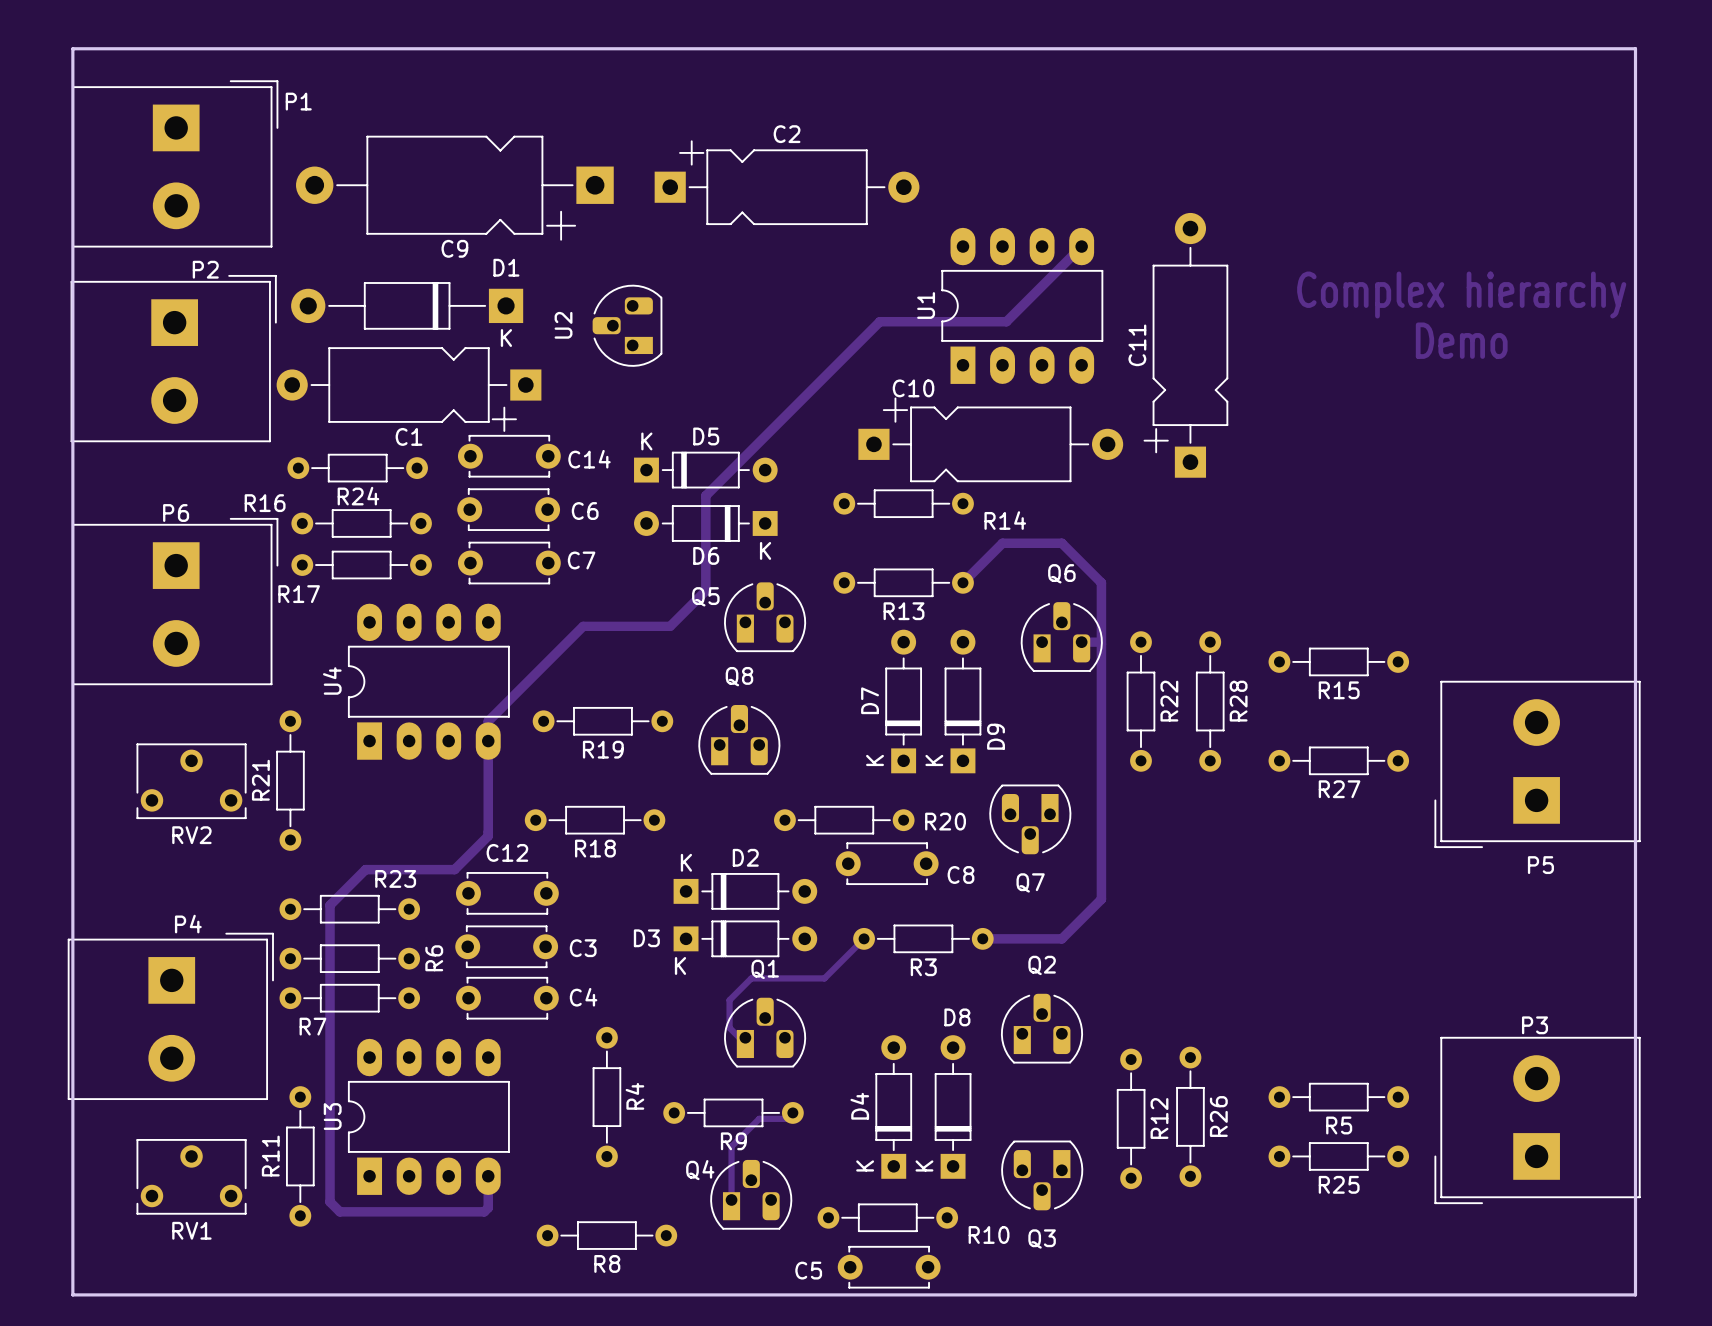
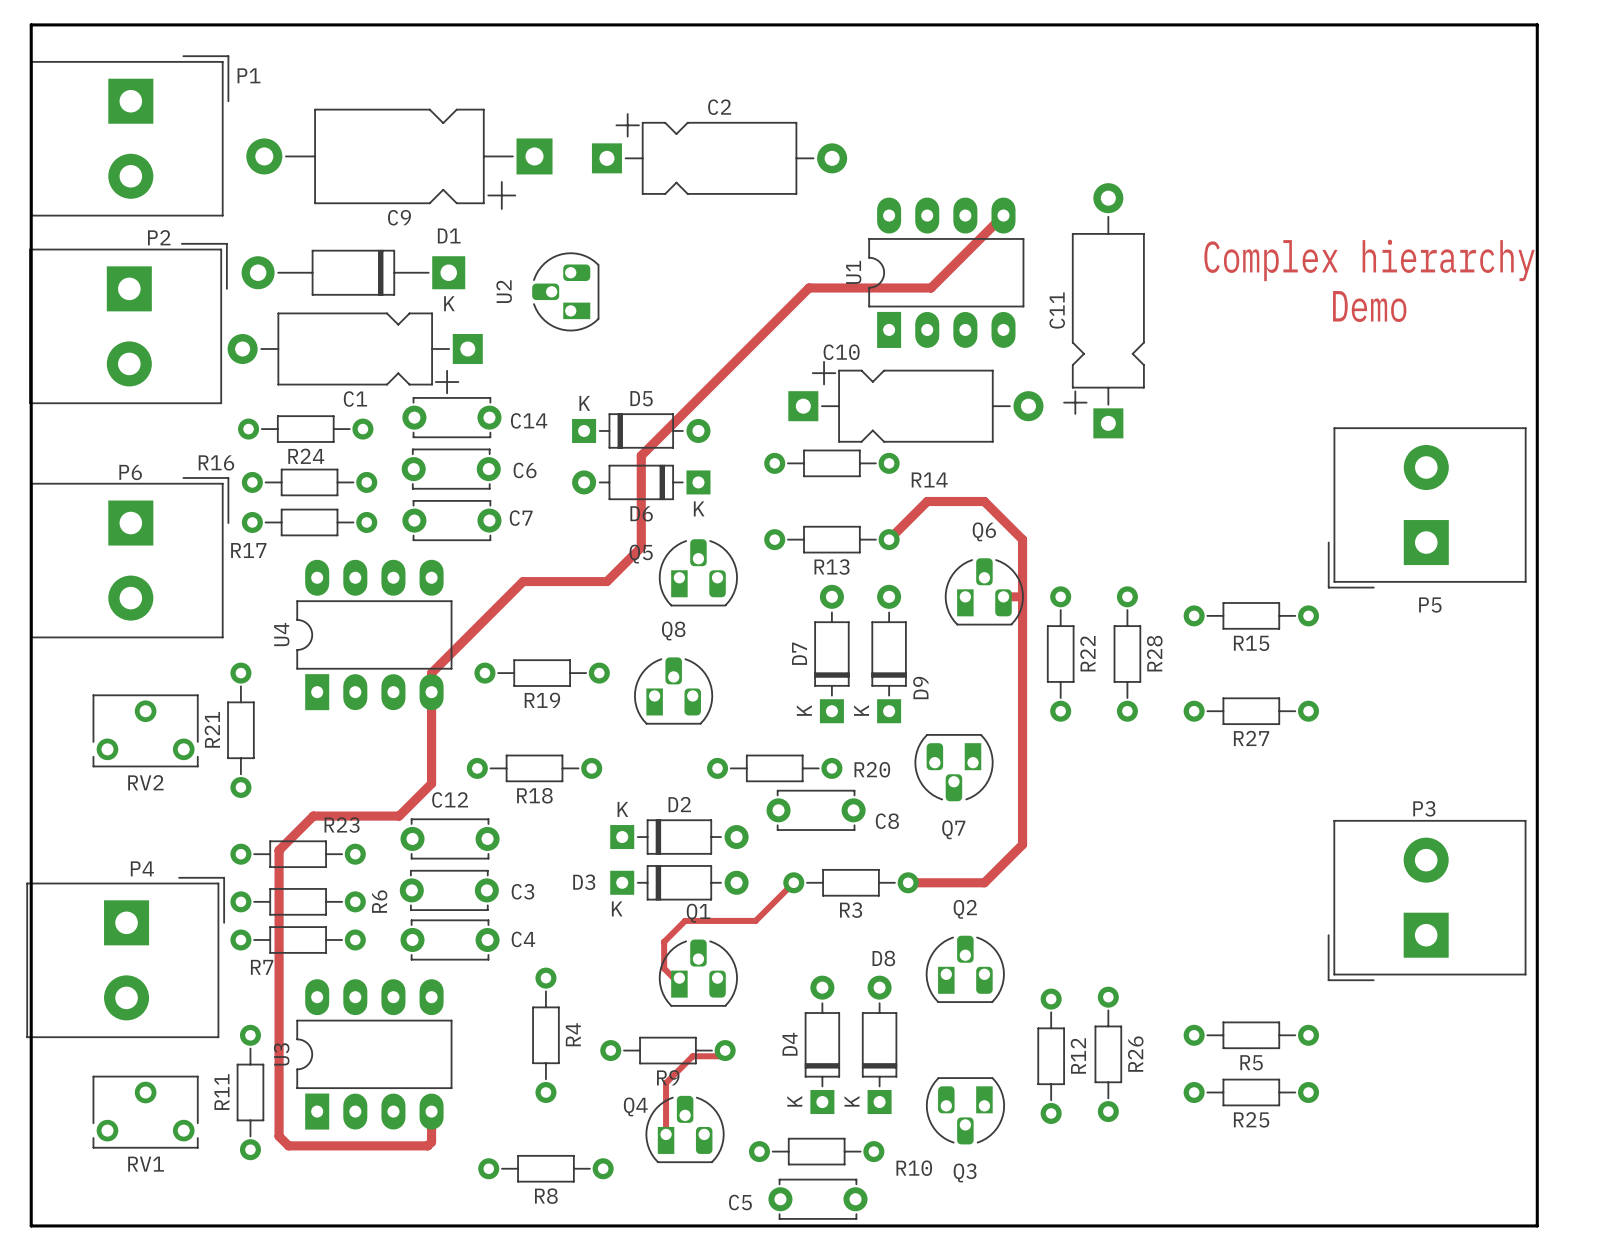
P5 position: (1537, 764) -> (1427, 507)
P3 position: (1537, 1120) -> (1427, 900)

